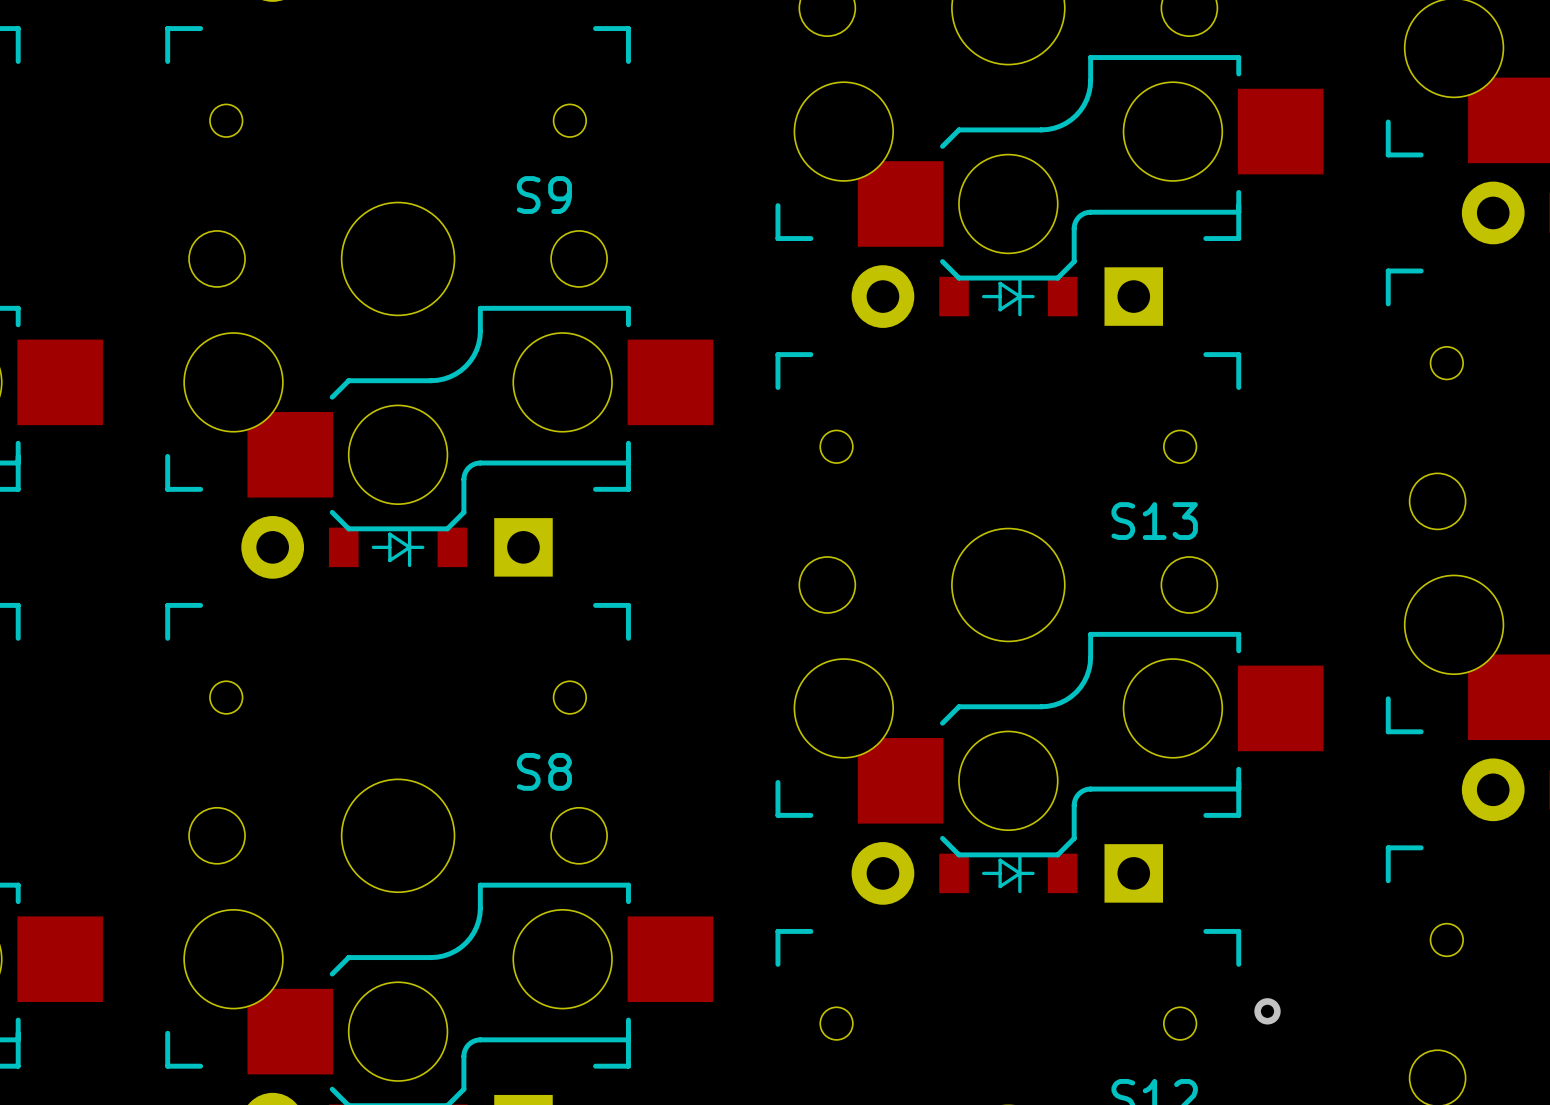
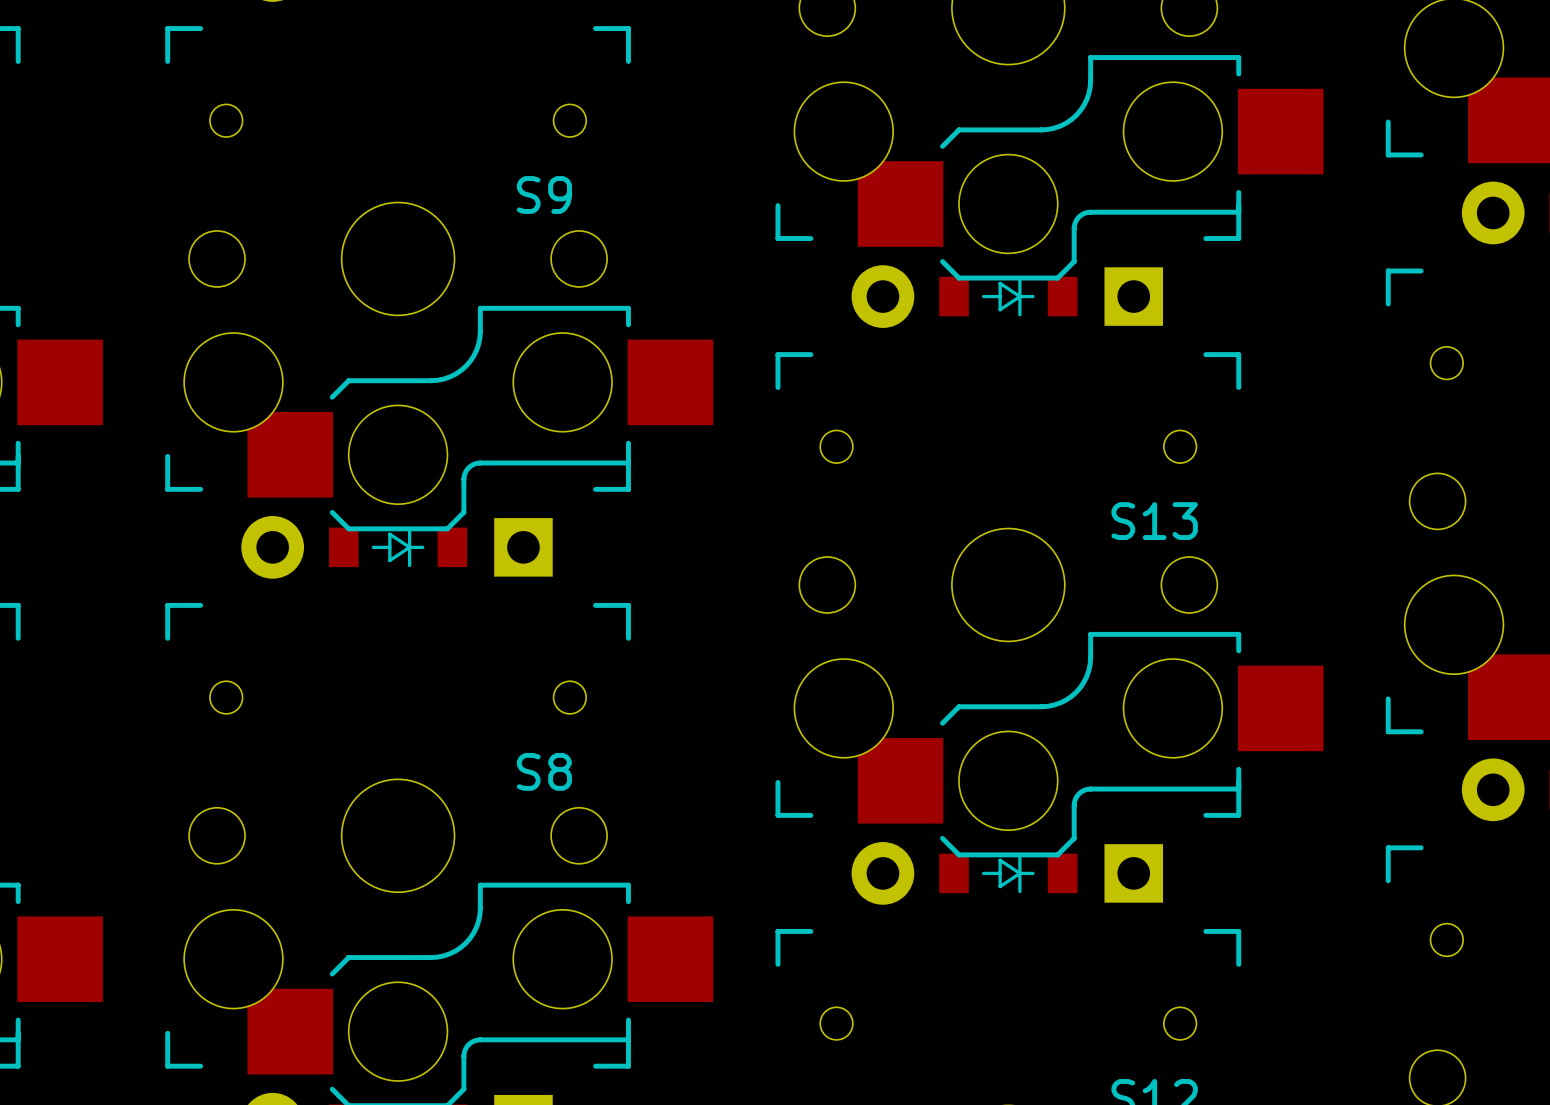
via: (1267, 1011) -> none

